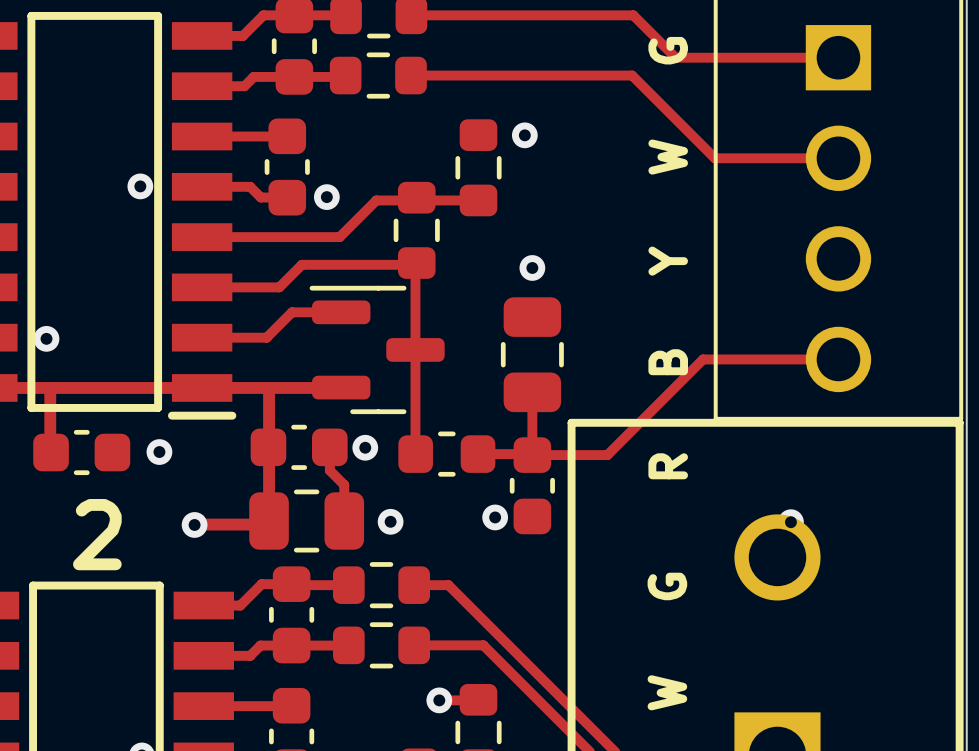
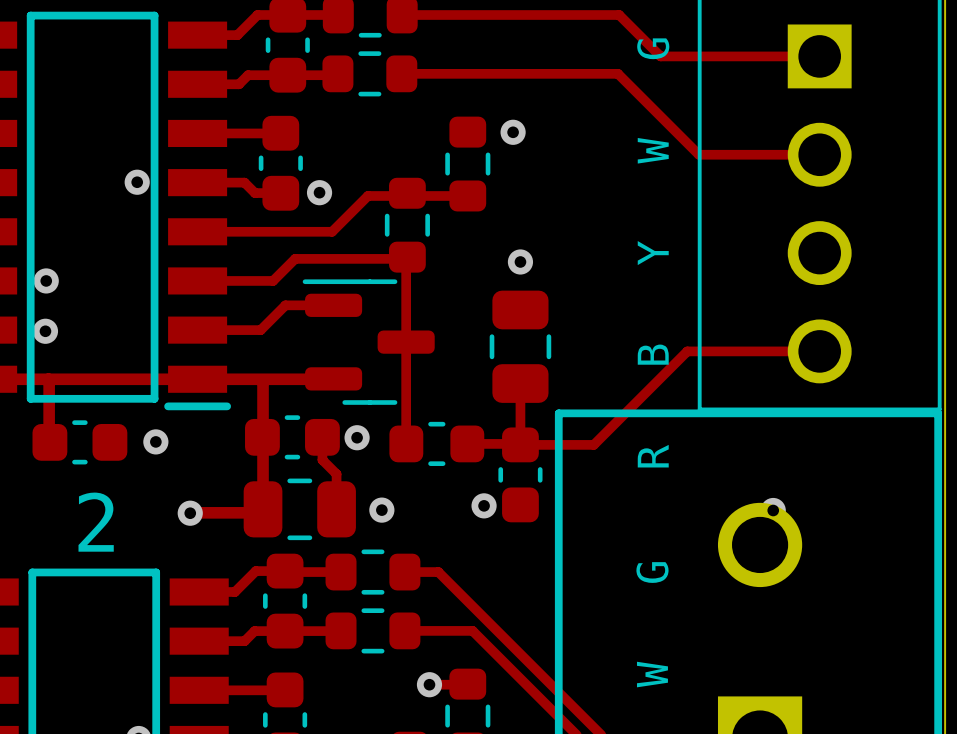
via: none -> (46, 280)

